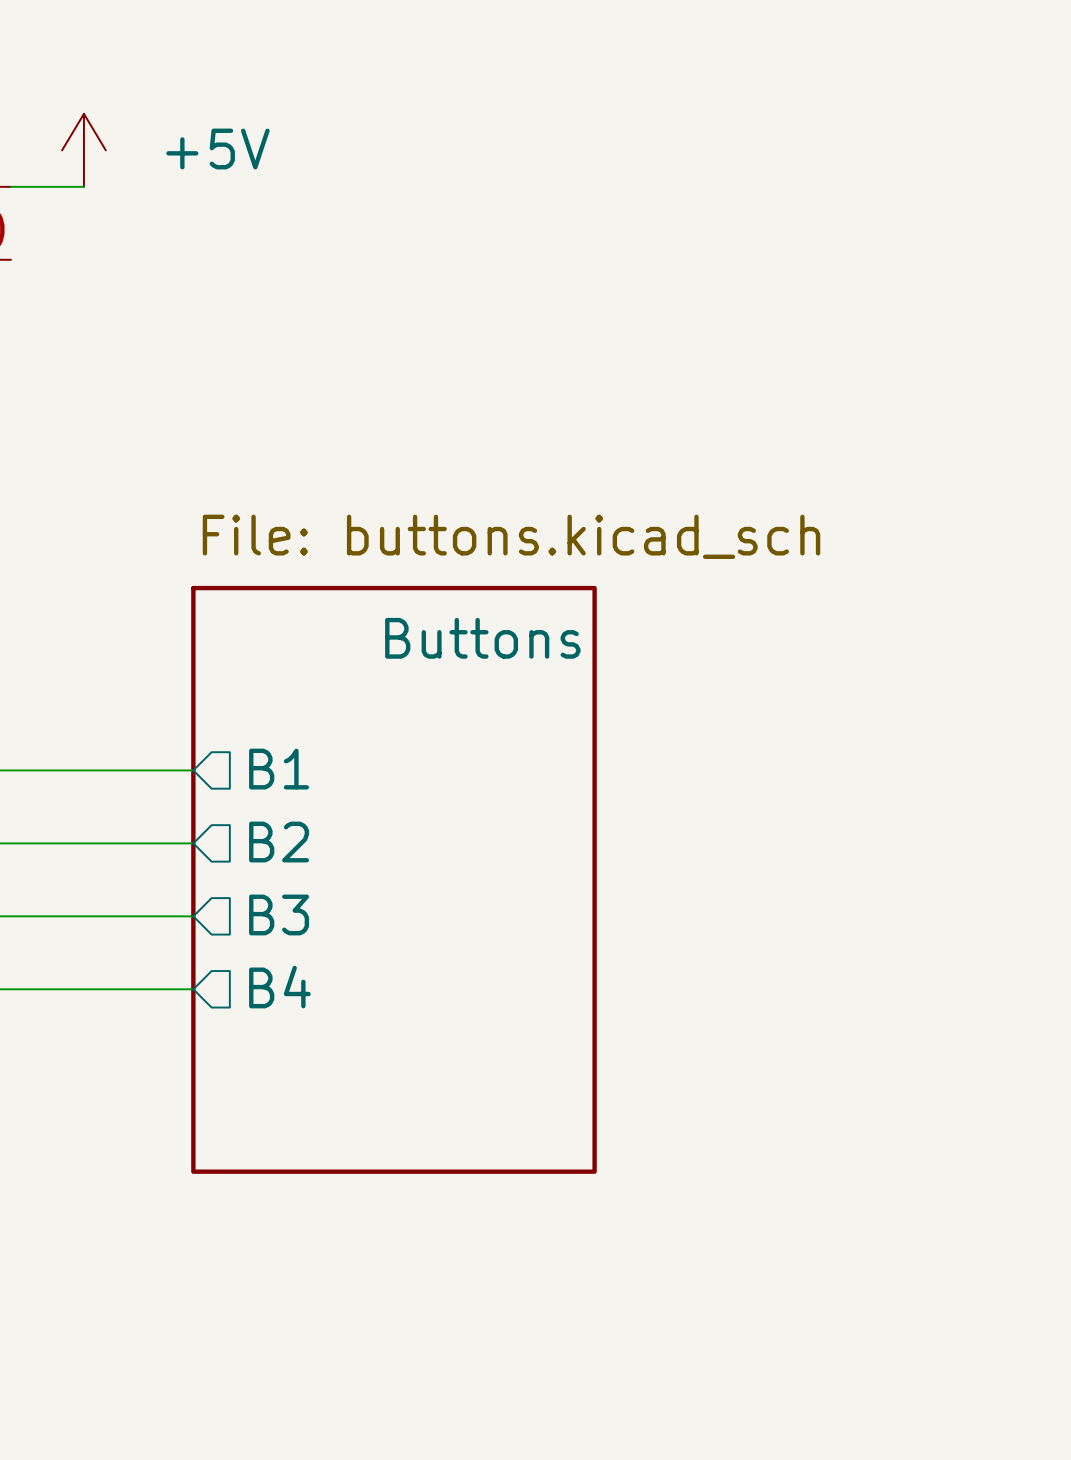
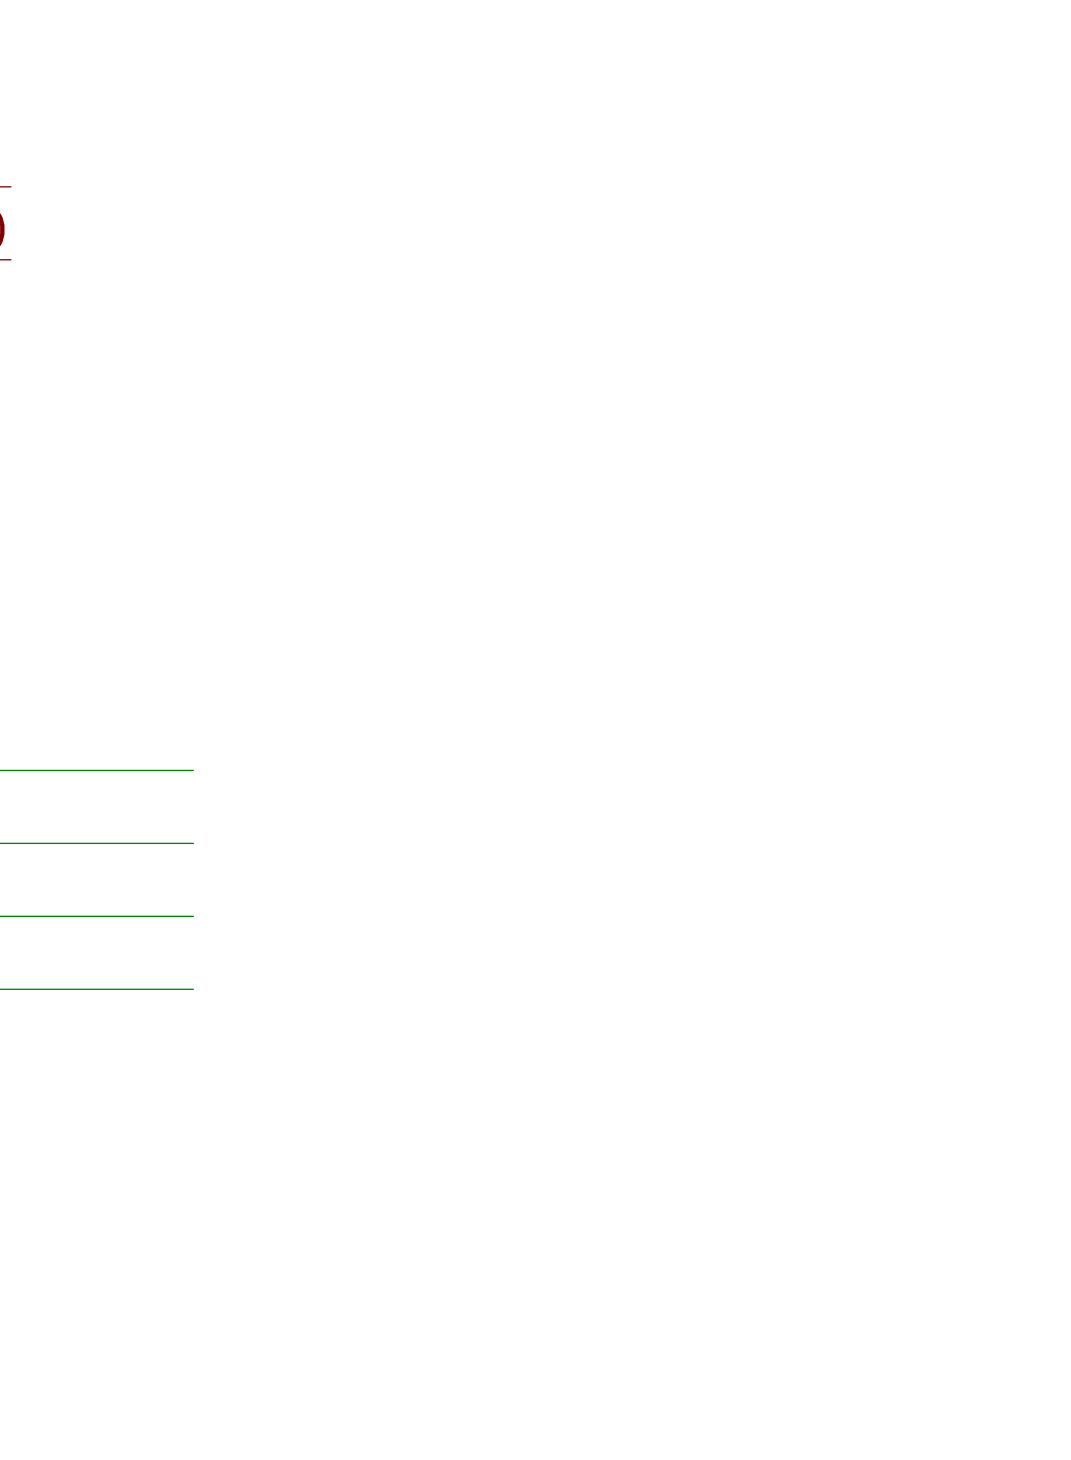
power symbol: +5V (83, 150) -> none
wire: (11, 186) (83, 186) -> none
sheet pin: B1 (279, 769) -> none
sheet pin: B2 (279, 842) -> none
sheet Buttons: File: buttons.kicad_sch (393, 879) -> none
sheet pin: B3 (279, 914) -> none
sheet pin: B4 (279, 987) -> none

